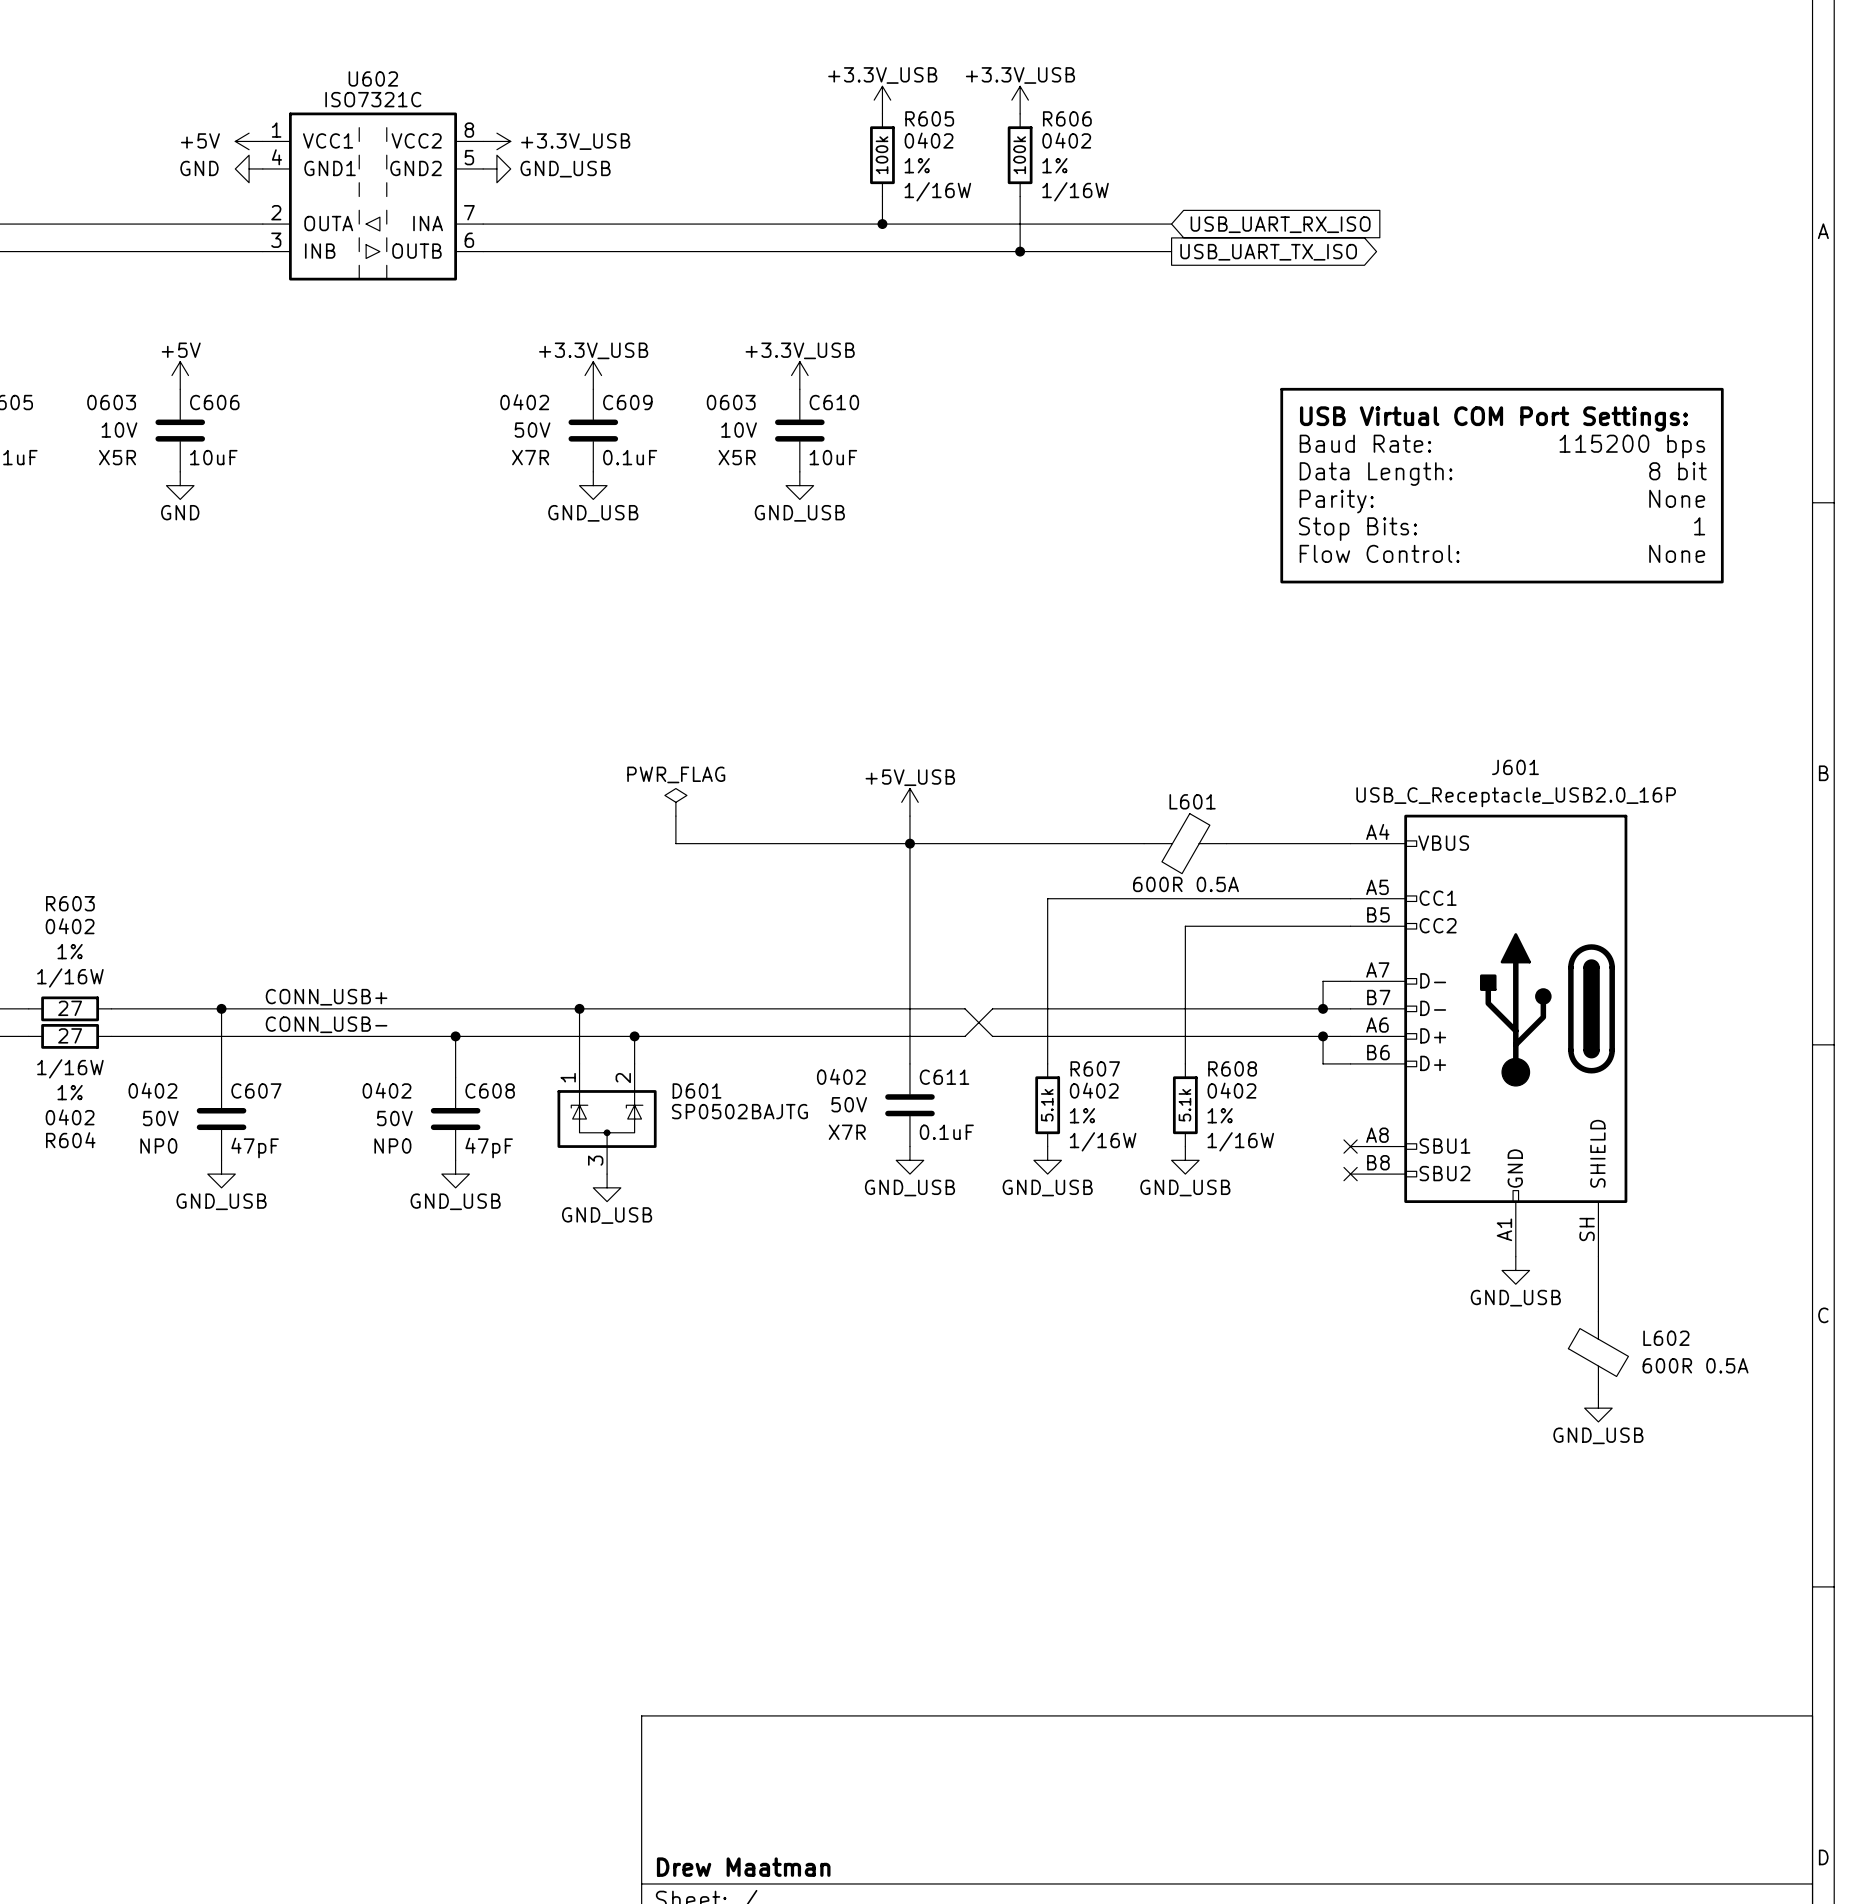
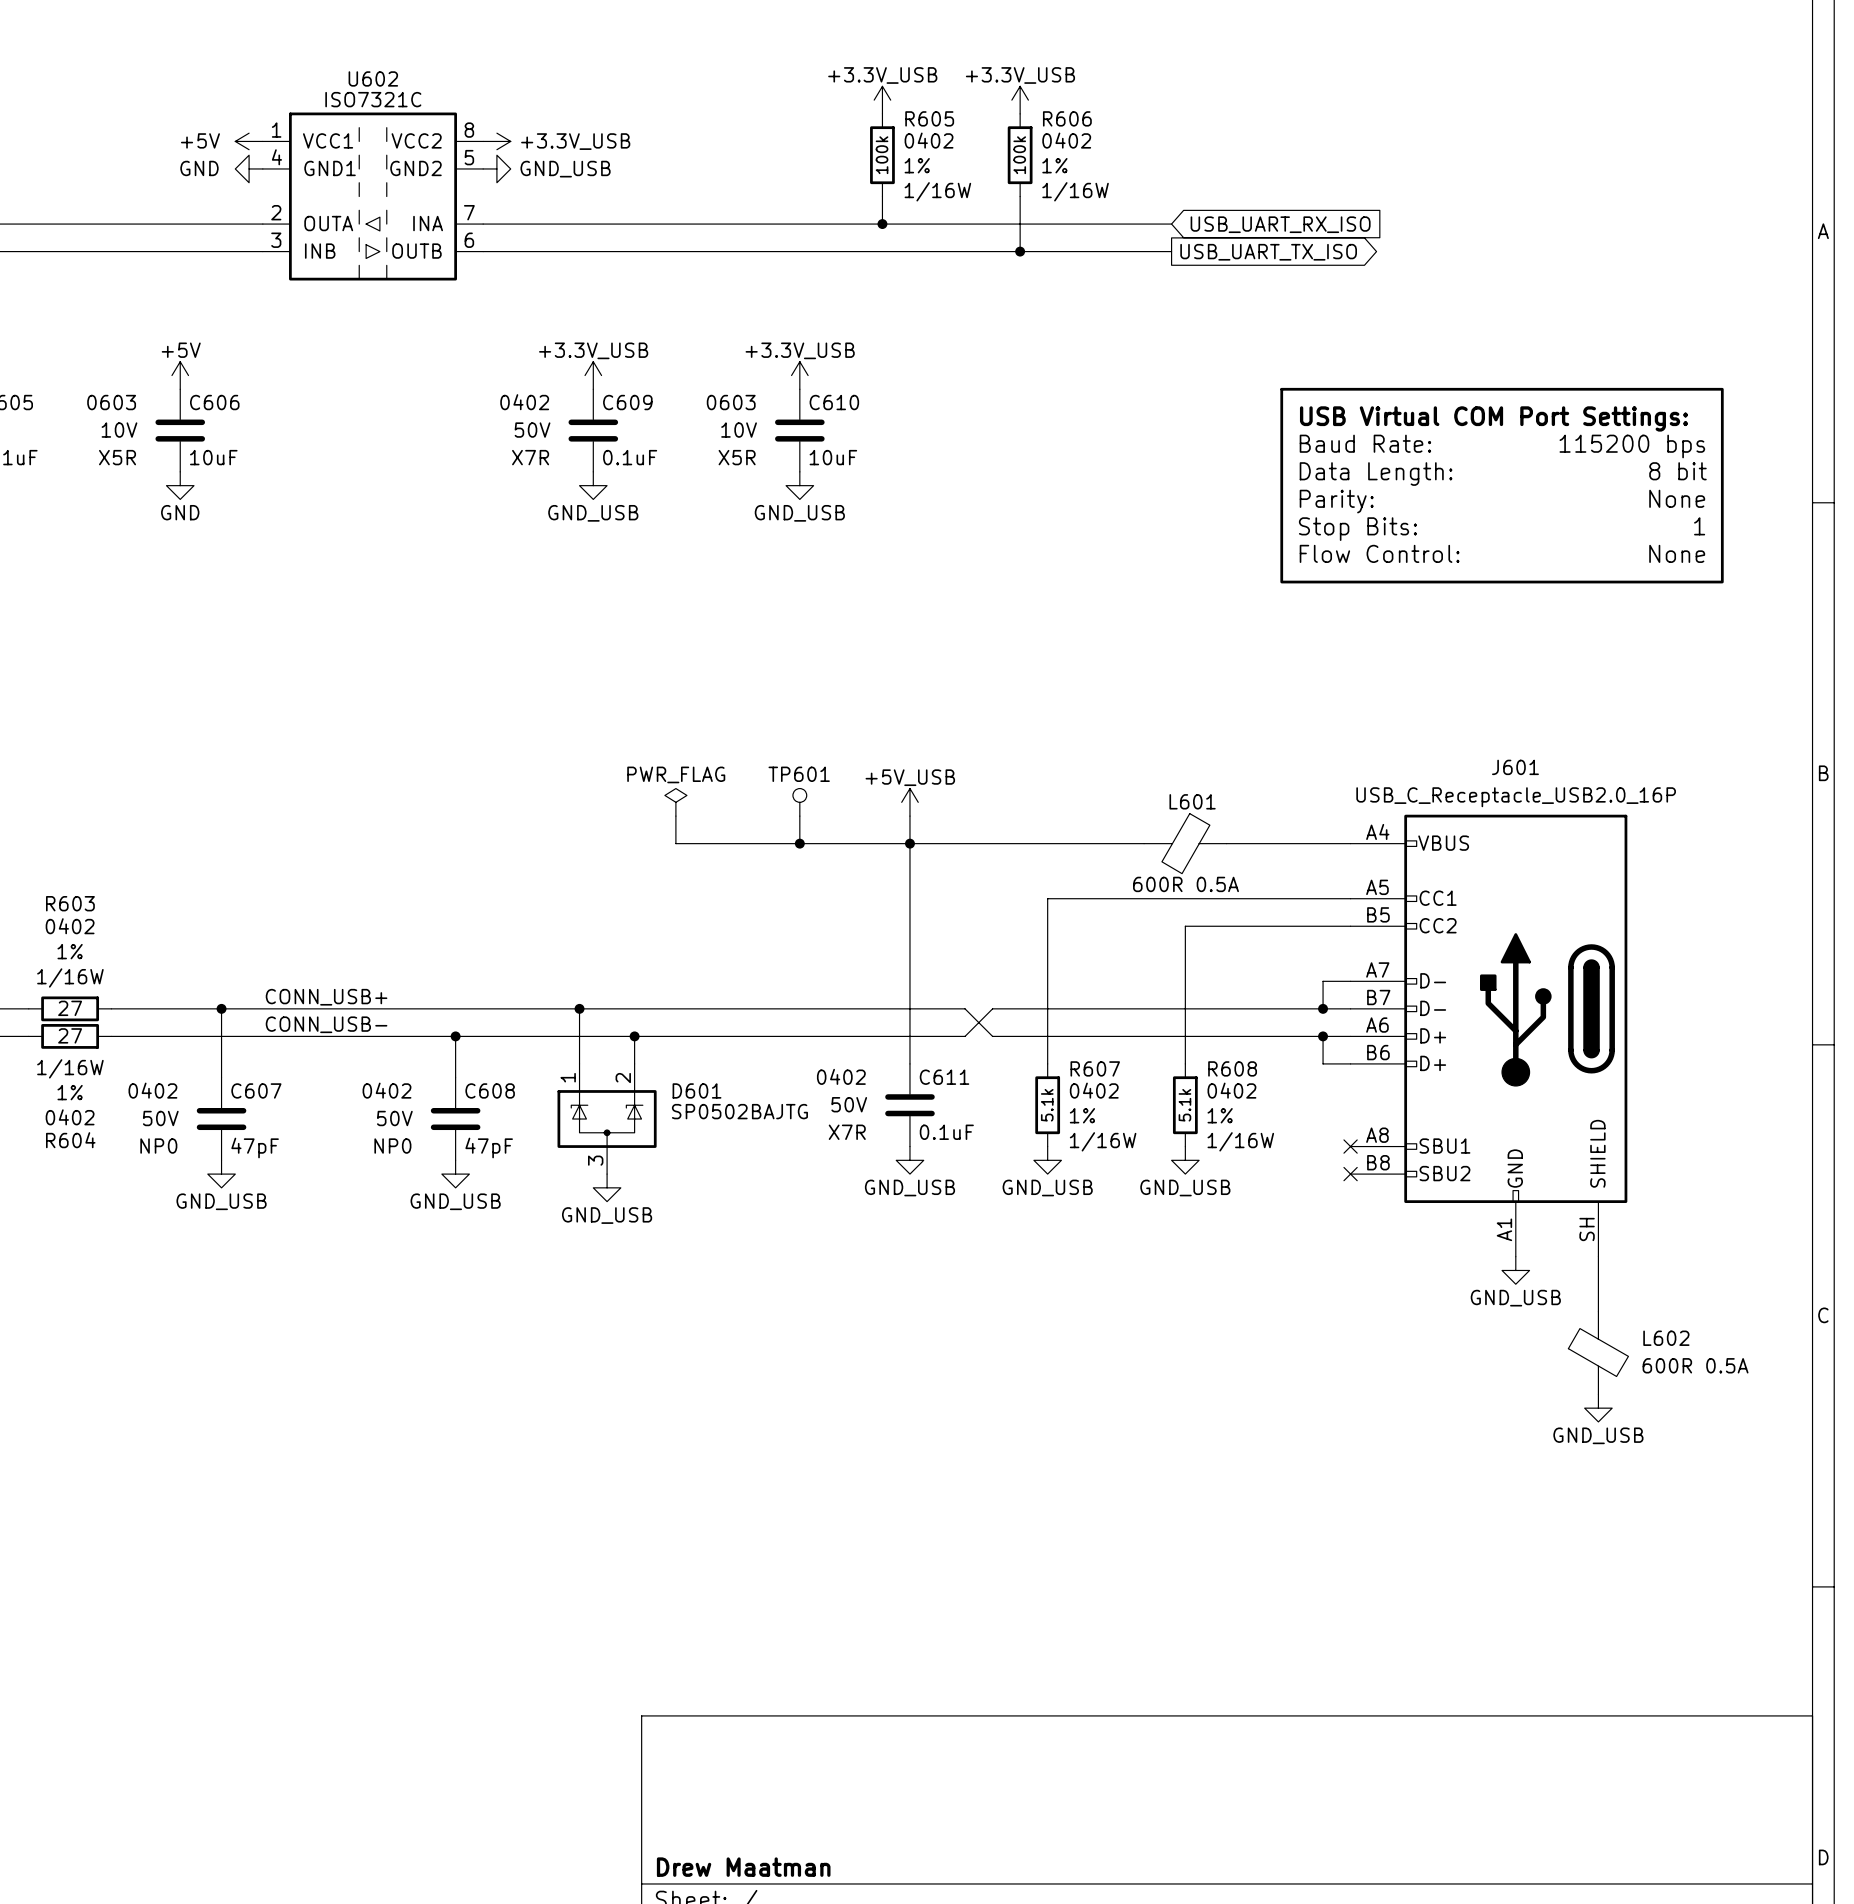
TP601: none -> (799, 802)
wire: none -> (799, 816) (799, 843)
junction: none -> (799, 843)

